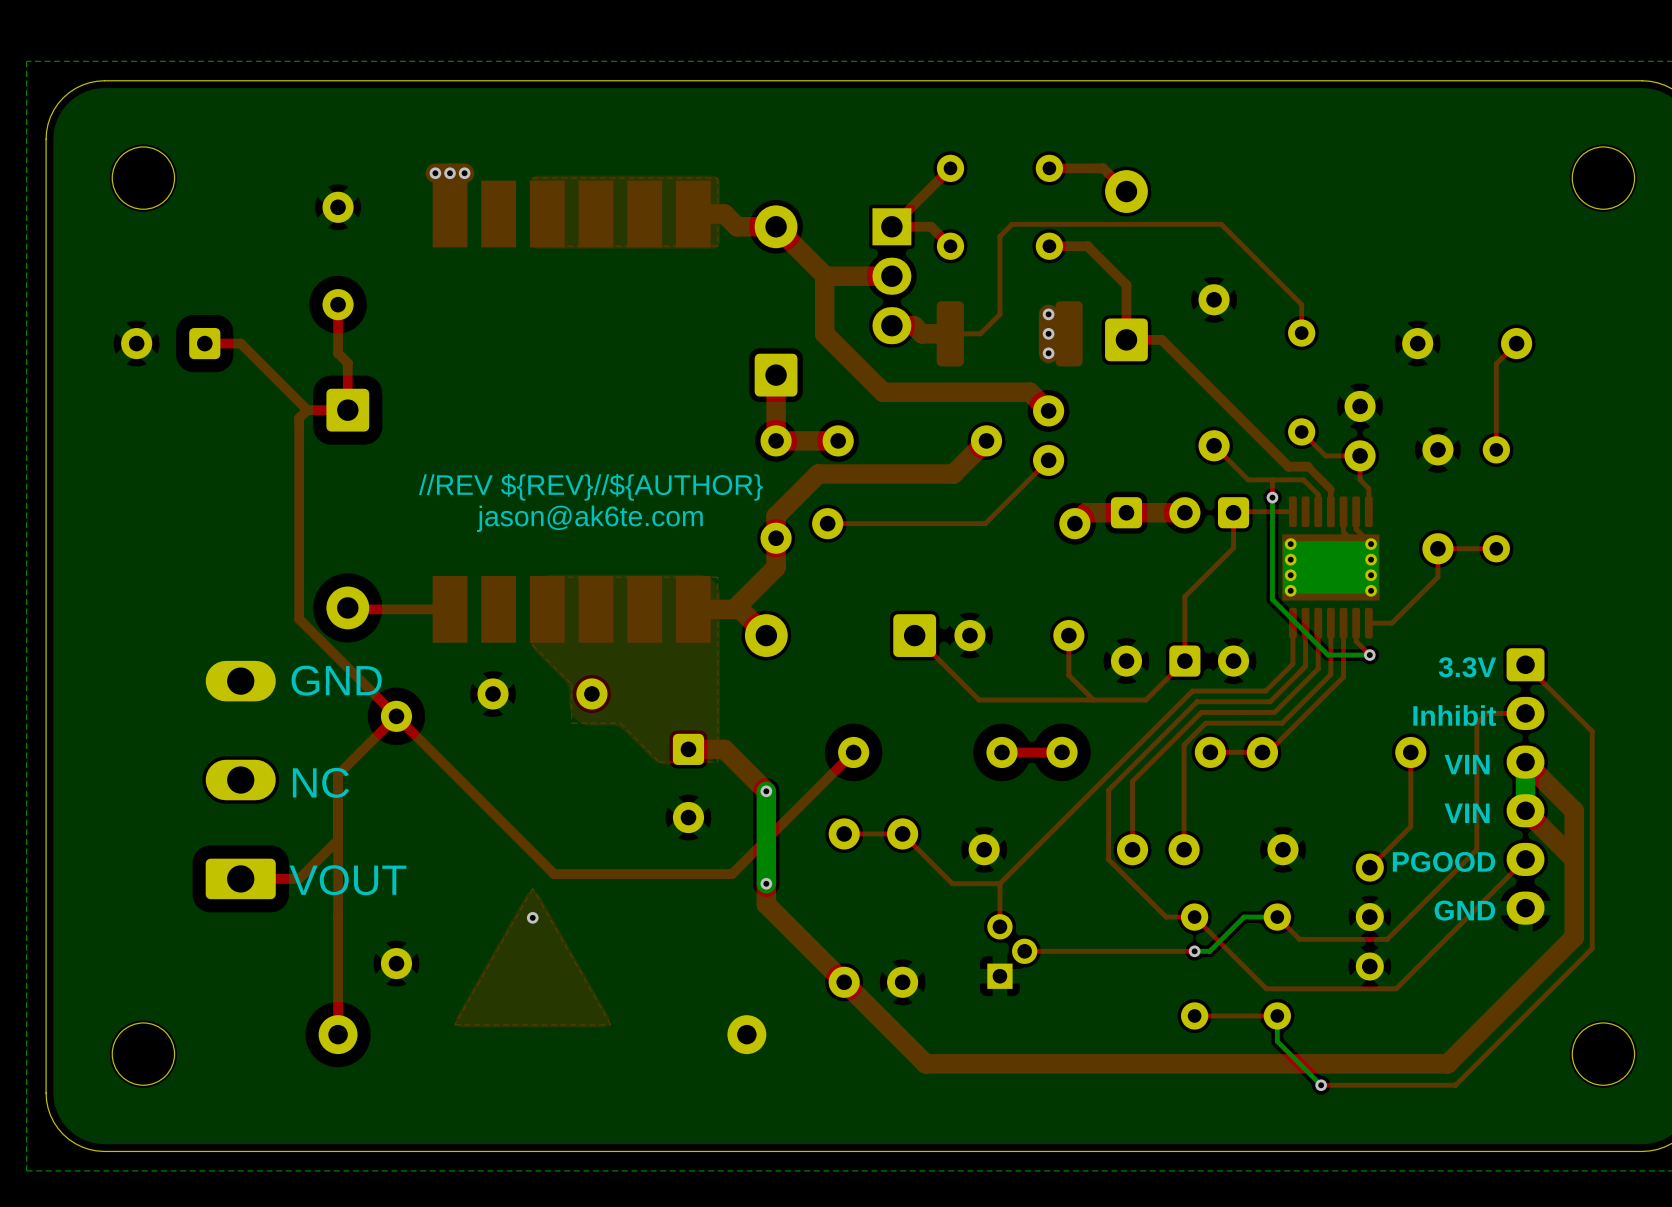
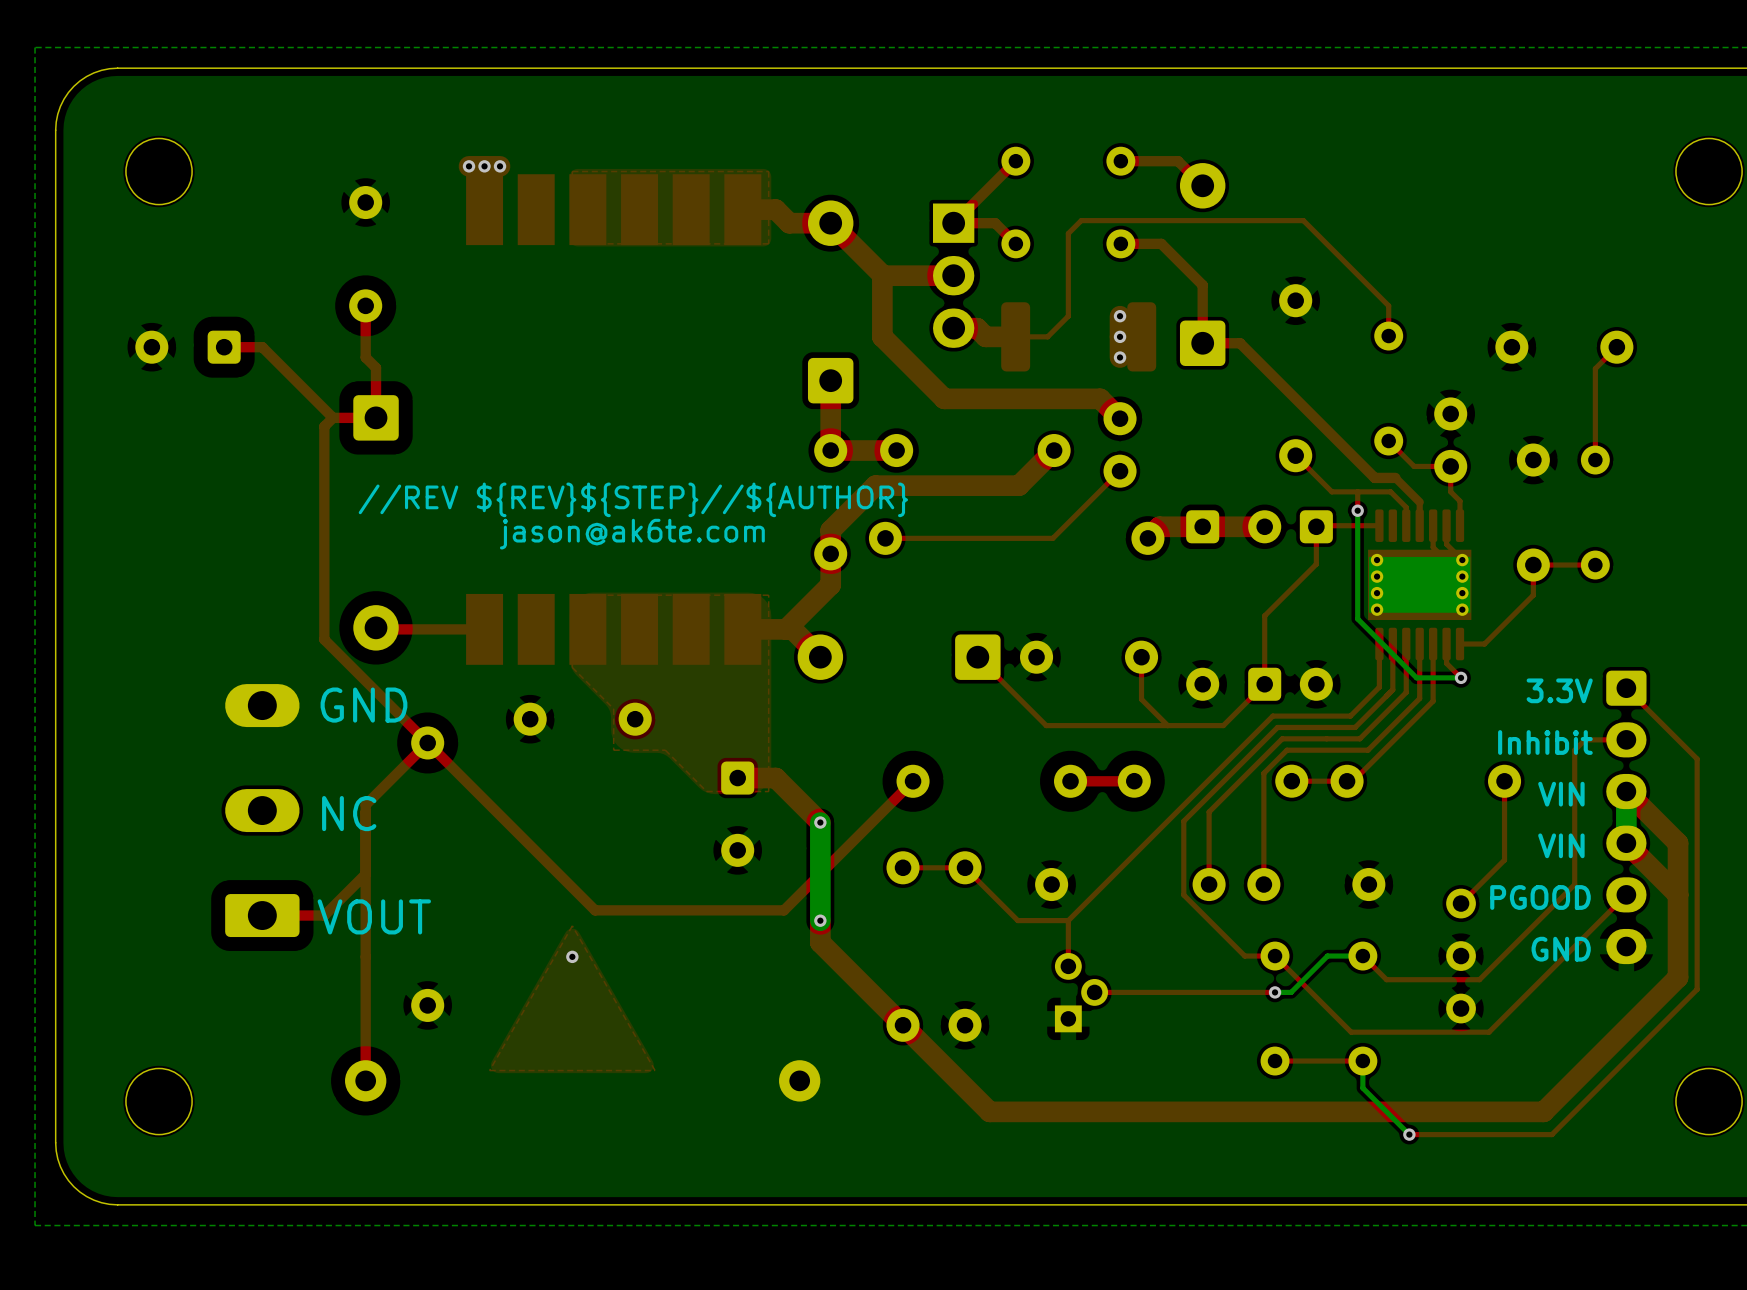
text: //REV ${REV}//${AUTHOR} (590, 487) -> //REV ${REV}${STEP}//${AUTHOR} (633, 499)

